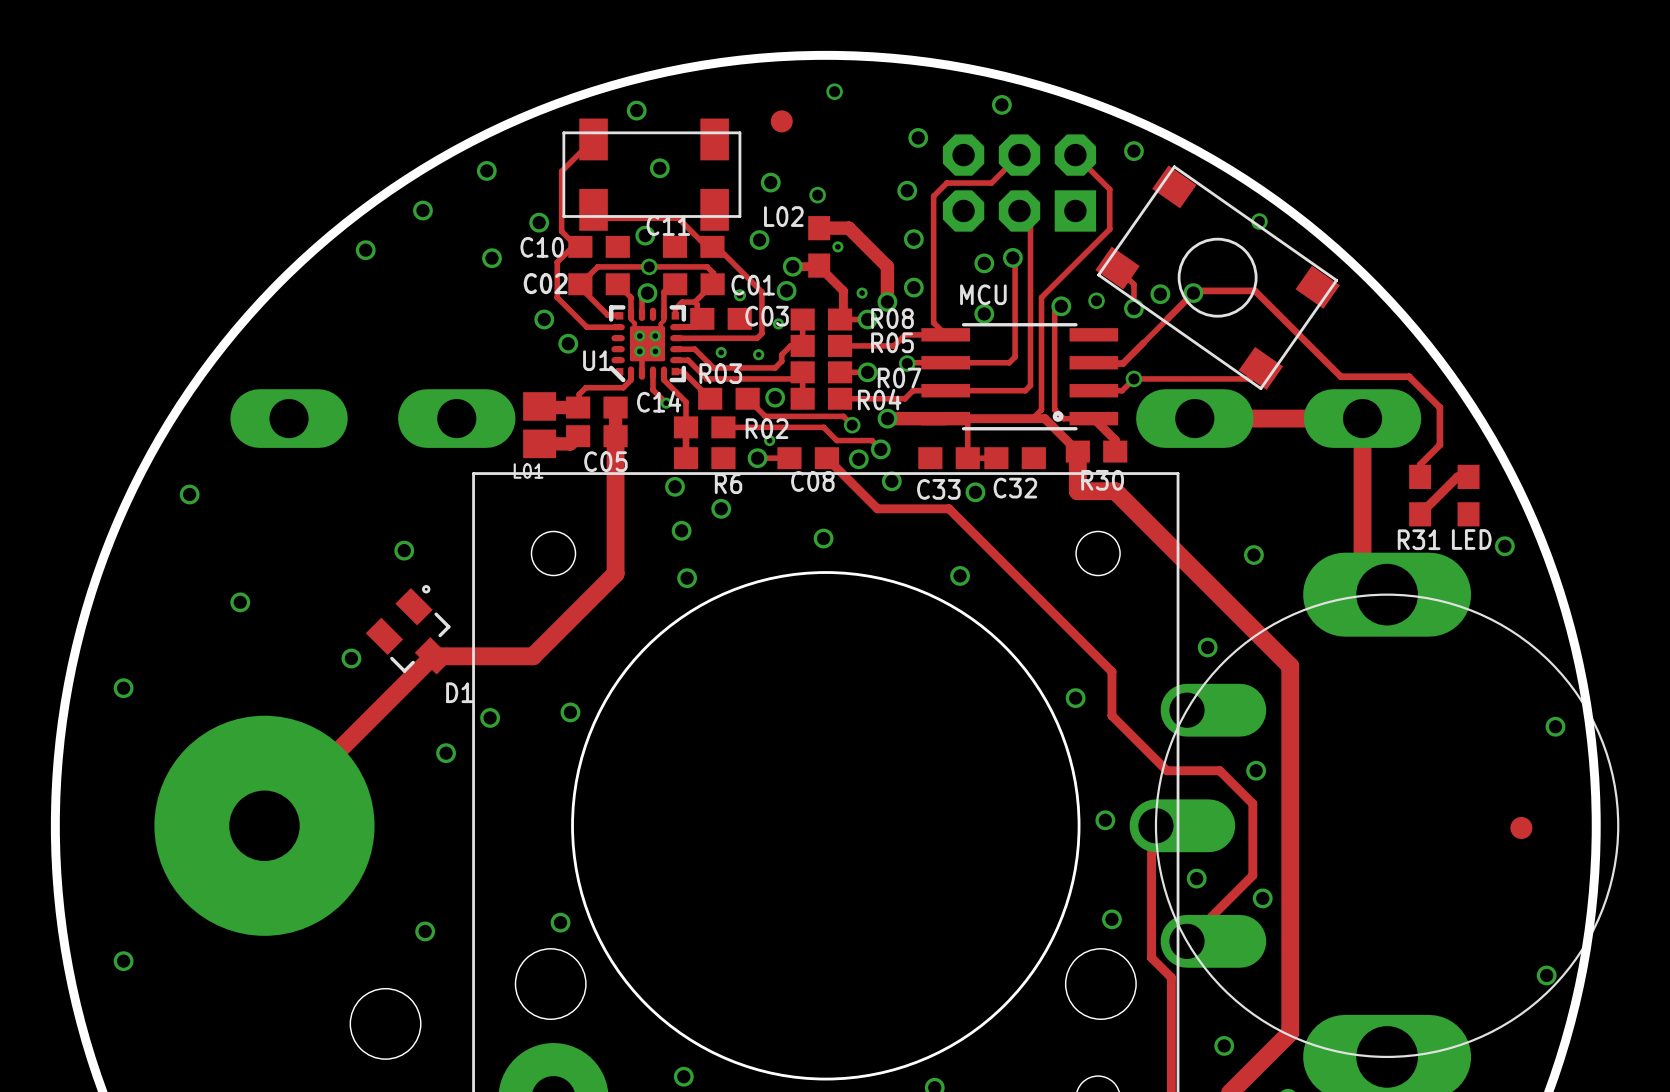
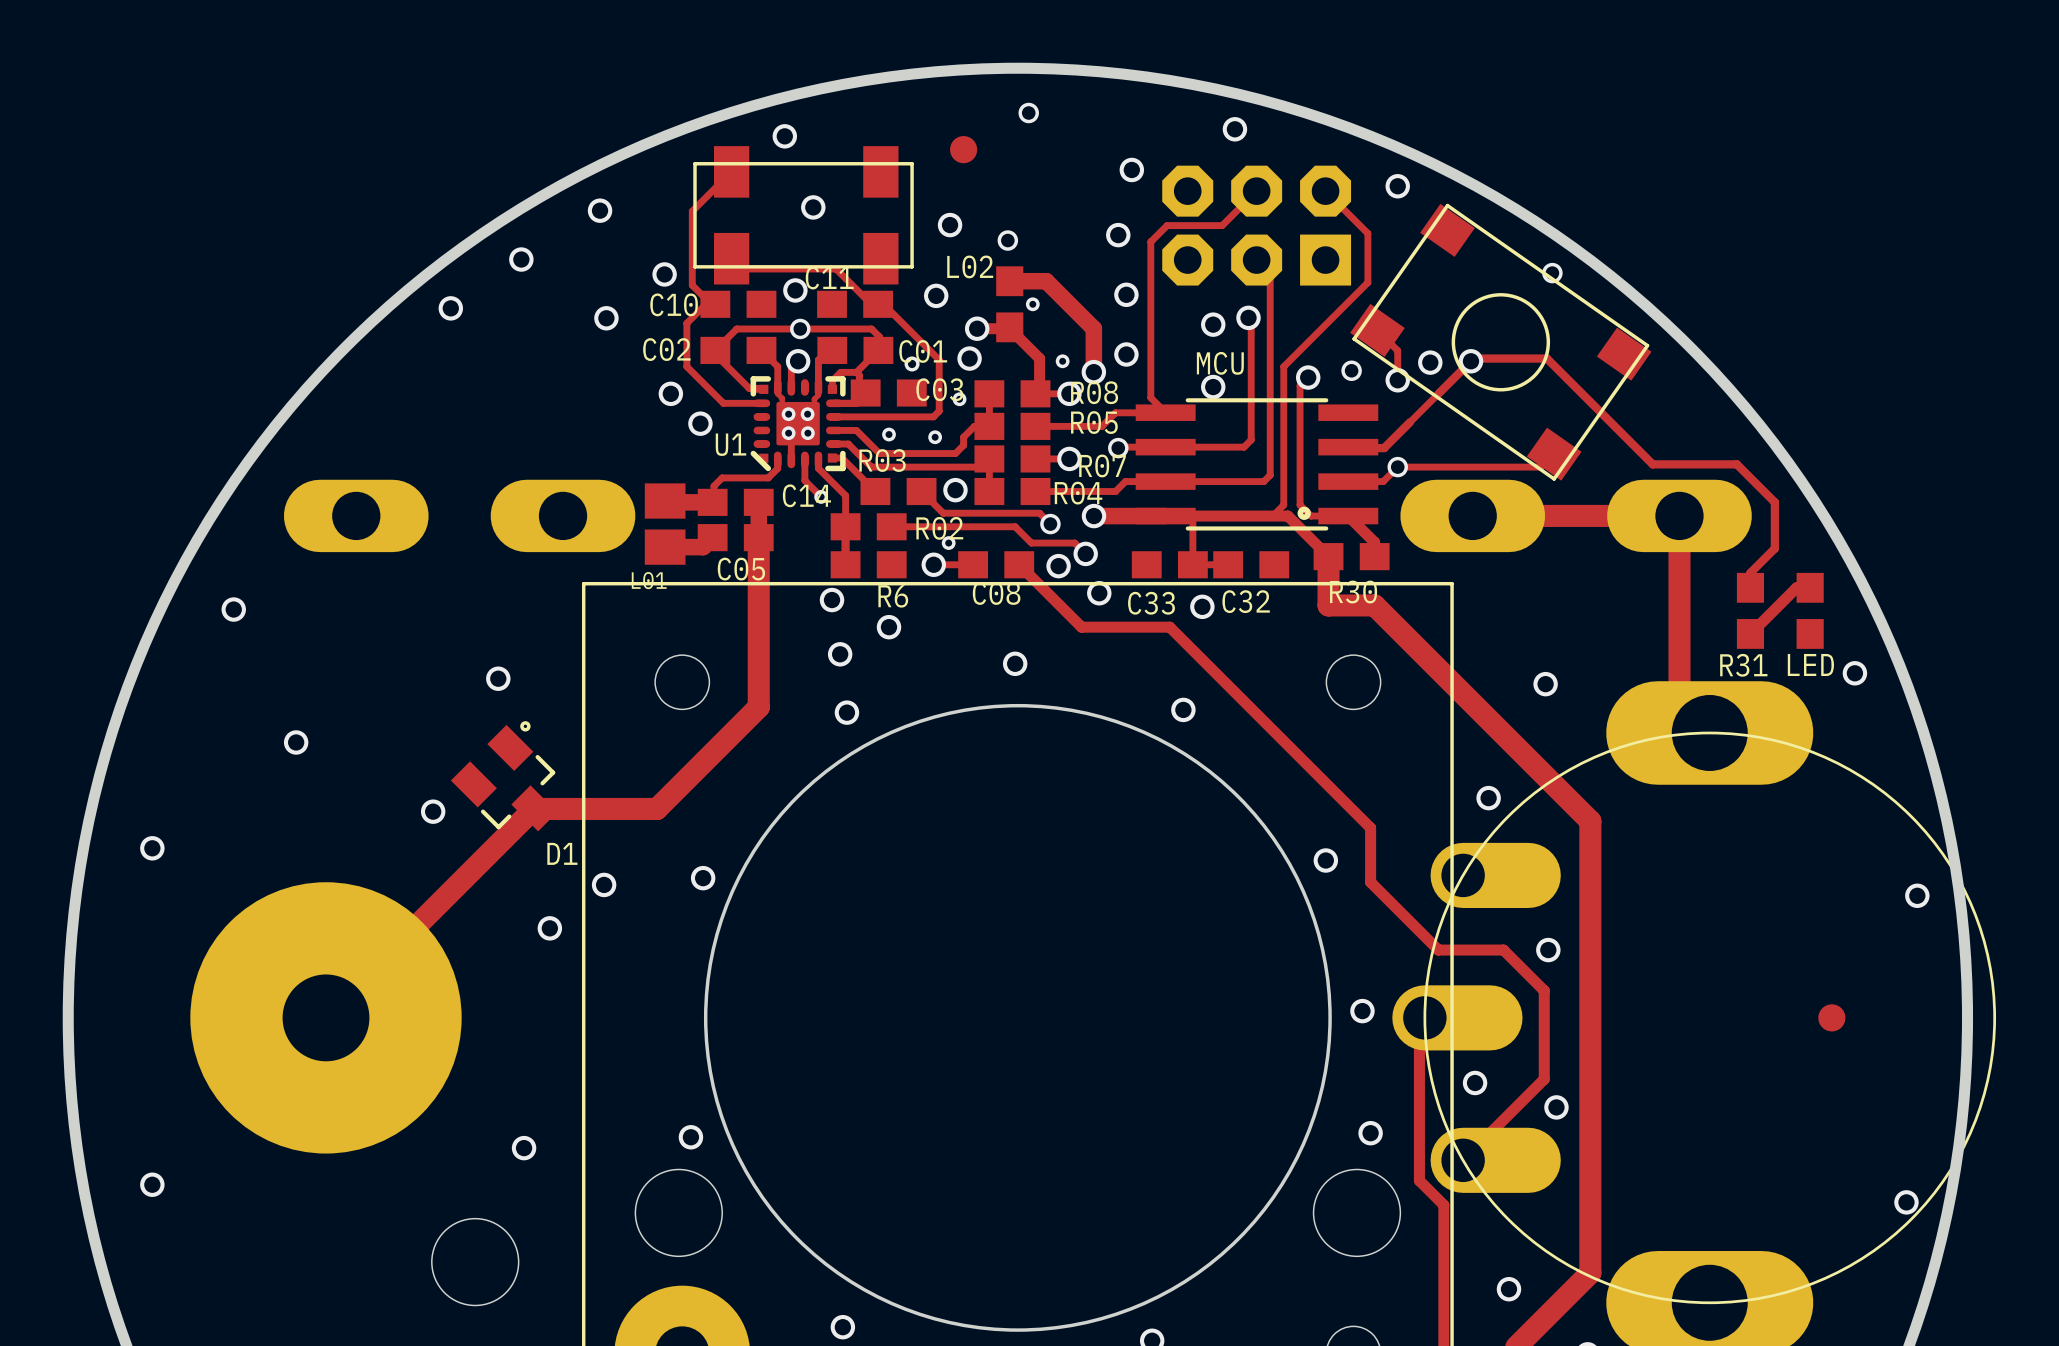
part position: (1521, 827) -> (1831, 1017)

